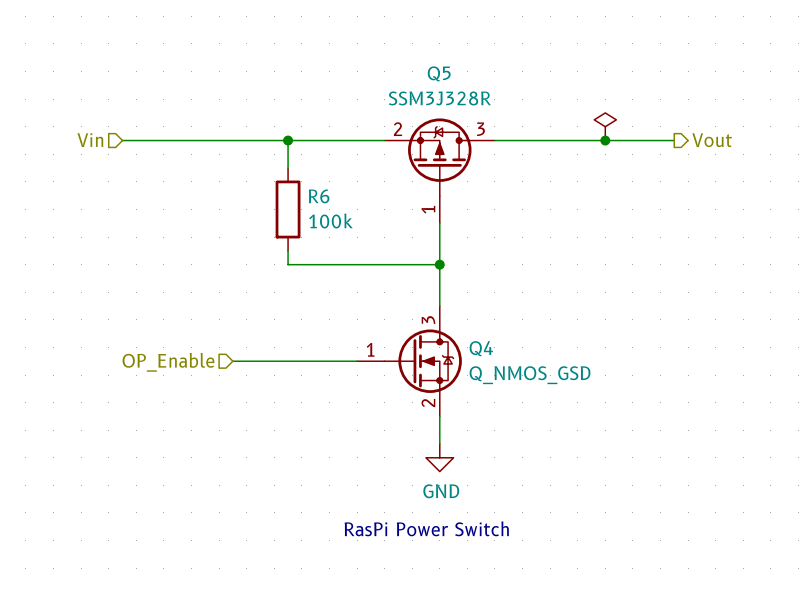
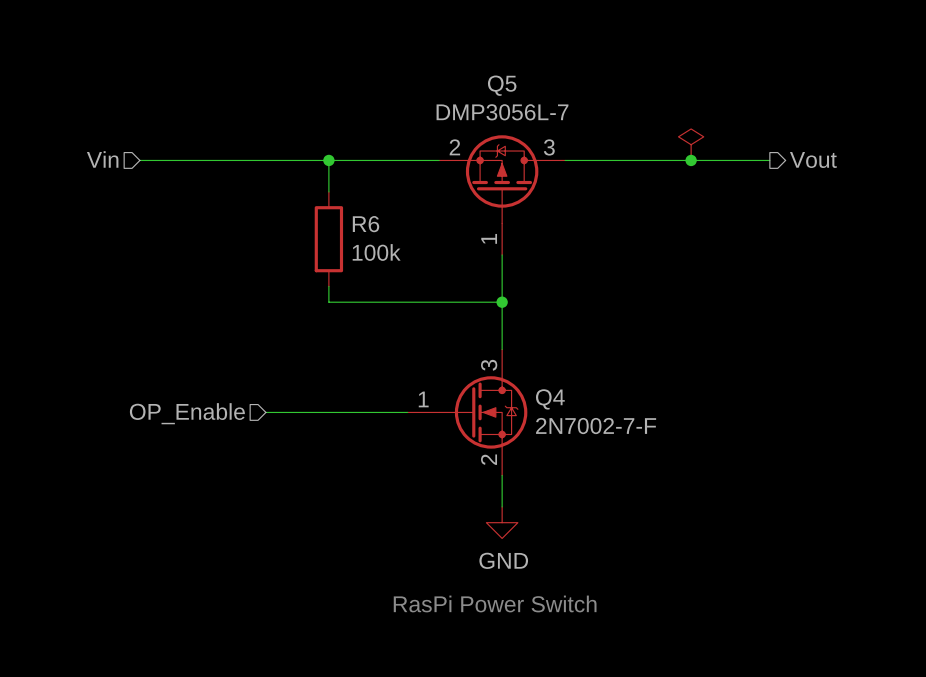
Q5 text: none -> DMP3056L-7 (502, 112)
Q5 value: SSM3J328R (439, 98) -> none
Q4 value: Q_NMOS_GSD (530, 375) -> 2N7002-7-F (596, 426)

